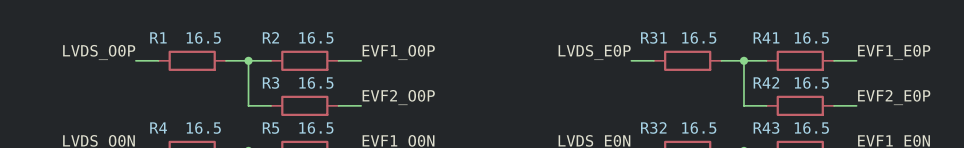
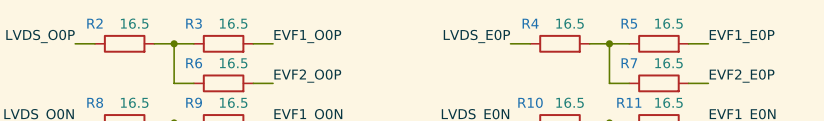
R1 name: R1 (158, 37) -> R2 (94, 23)
R2 name: R2 (270, 37) -> R3 (194, 23)
R31 name: R31 (653, 37) -> R4 (530, 23)
R41 name: R41 (766, 37) -> R5 (629, 23)
R3 name: R3 (270, 82) -> R6 (194, 63)
R42 name: R42 (766, 82) -> R7 (629, 63)
R4 name: R4 (158, 127) -> R8 (95, 102)
R32 name: R32 (653, 127) -> R10 (530, 102)
R43 name: R43 (766, 127) -> R11 (629, 102)
R5 name: R5 (270, 128) -> R9 (194, 102)

